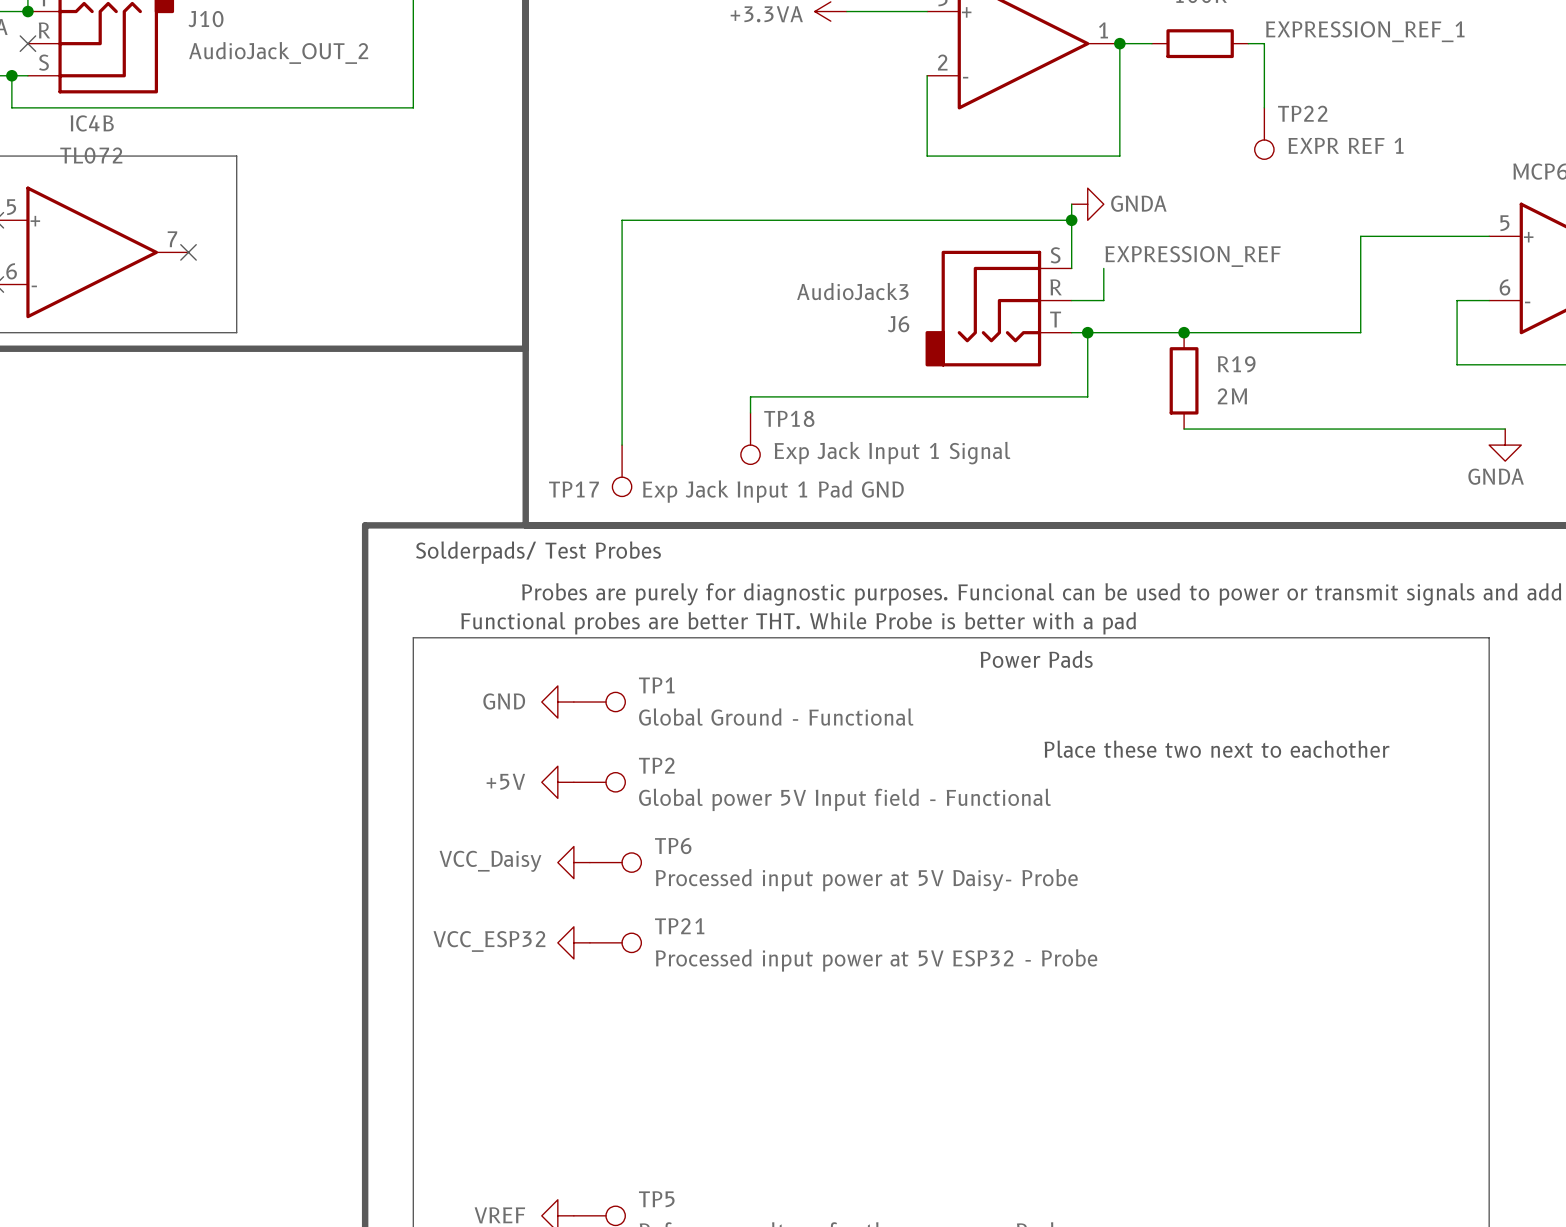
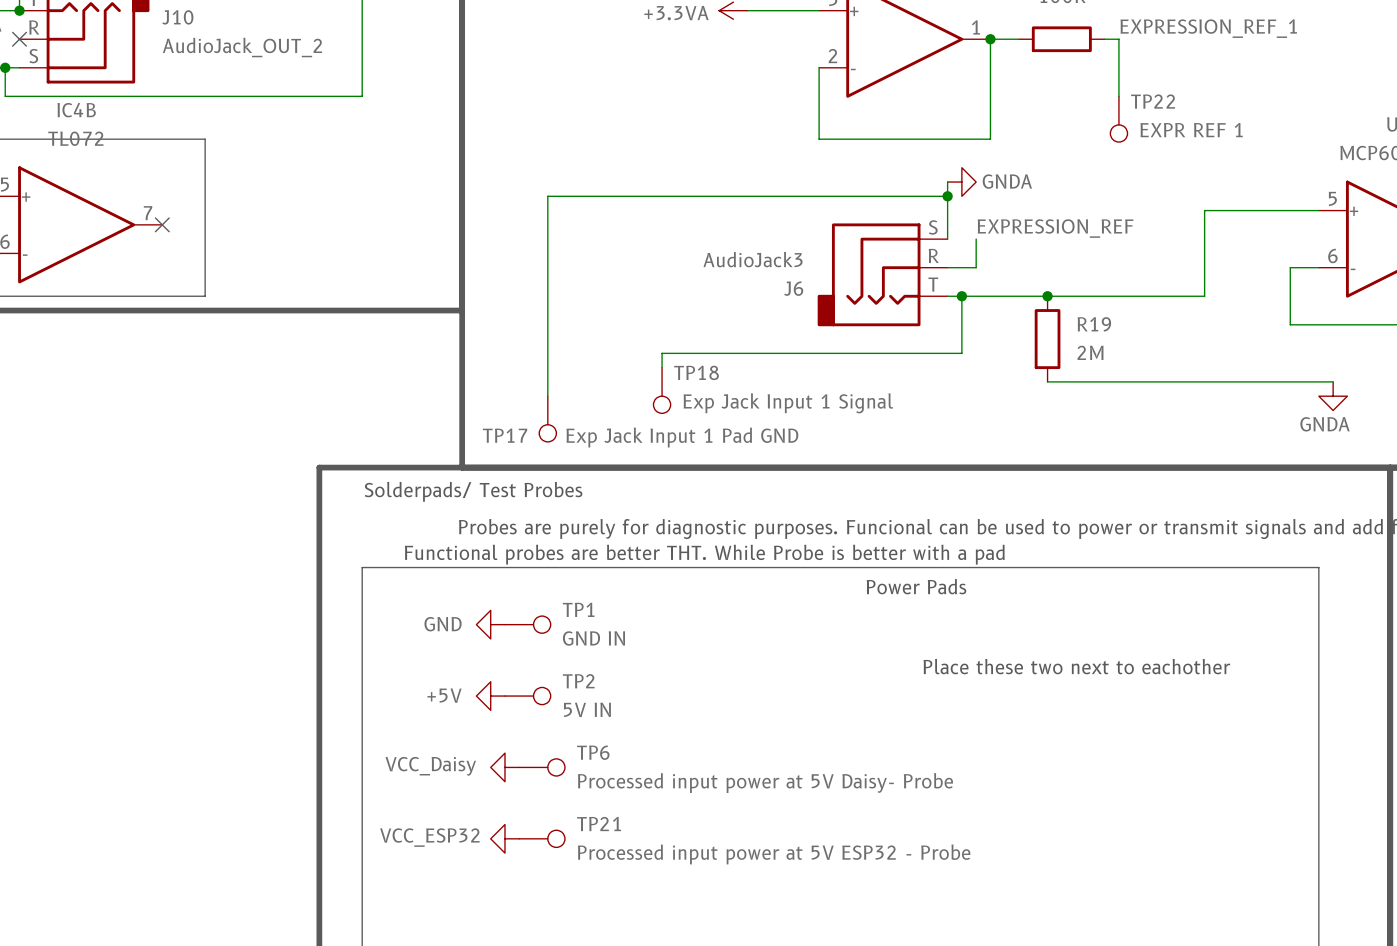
TP1 value: Global Ground - Functional (776, 717) -> GND IN (593, 638)
TP2 value: Global power 5V Input field - Functional (844, 799) -> 5V IN (587, 709)

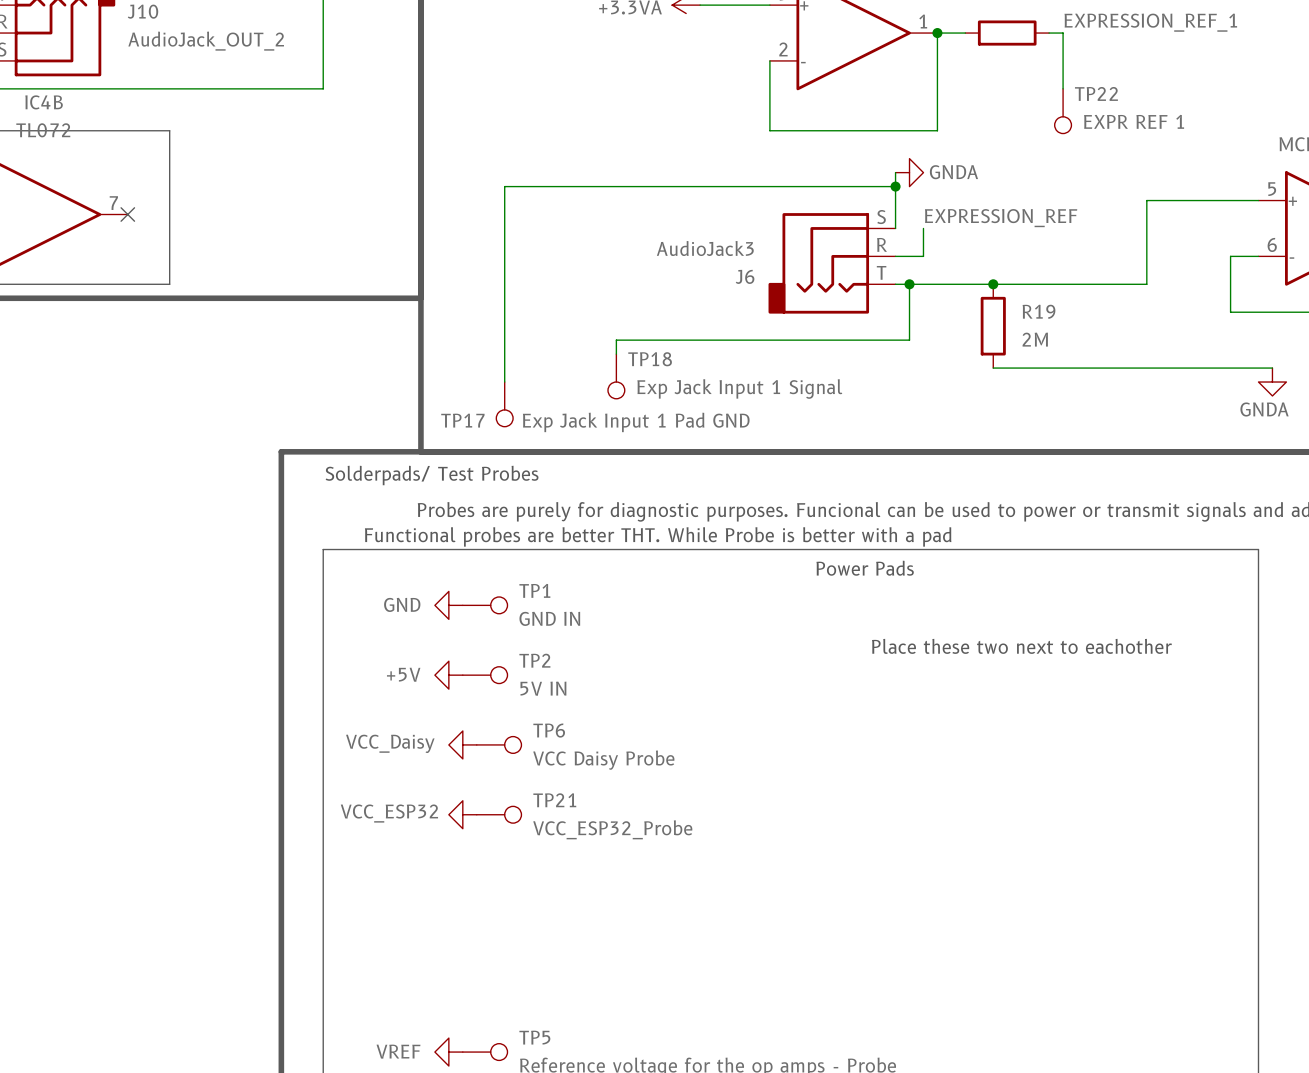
TP6 value: Processed input power at 5V Daisy- Probe (765, 783) -> VCC Daisy Probe (603, 760)
TP21 value: Processed input power at 5V ESP32 - Probe (774, 854) -> VCC_ESP32_Probe (612, 829)

